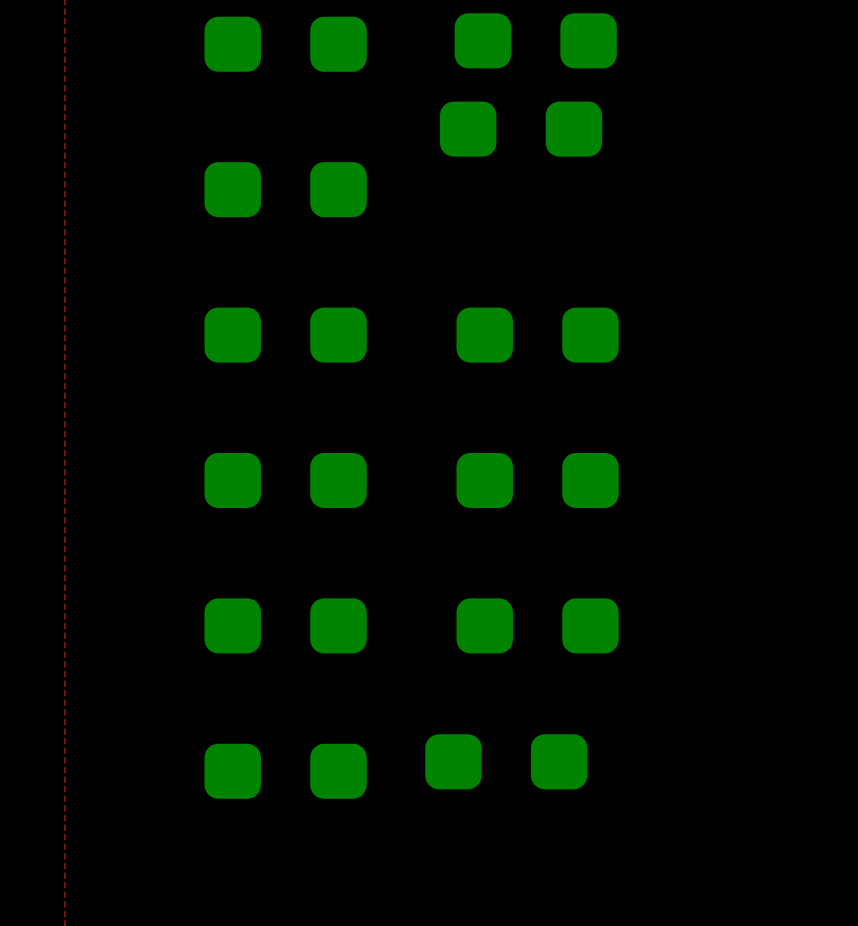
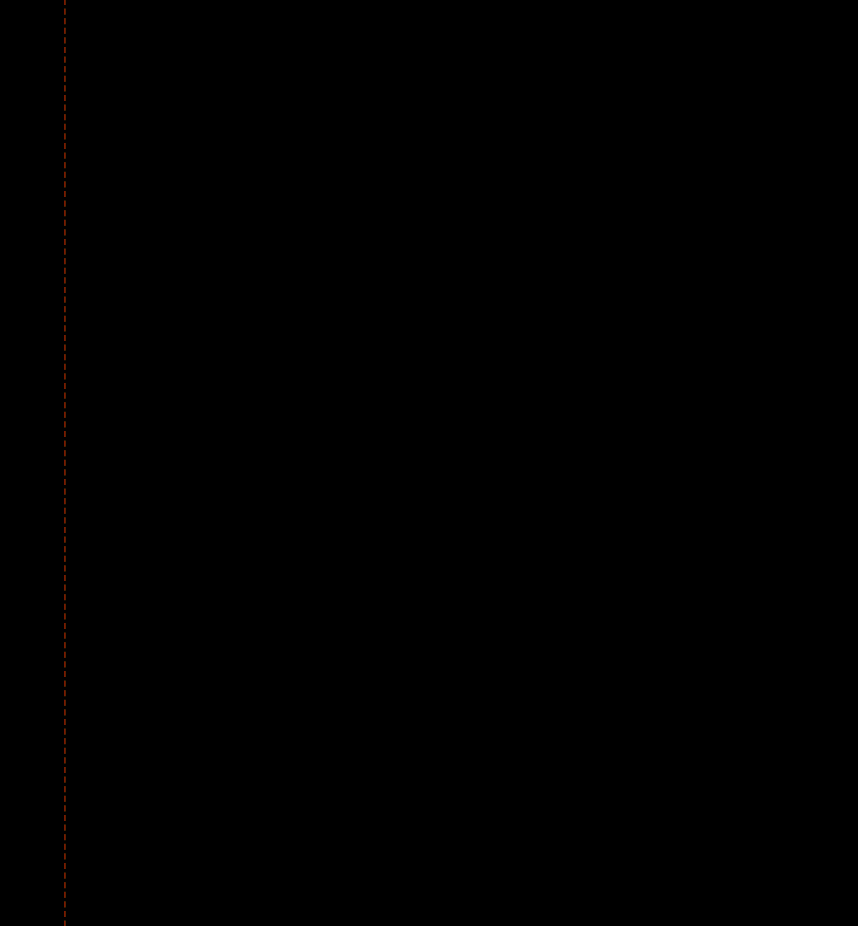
part: (535, 40) -> none
part: (285, 44) -> none
part: (521, 129) -> none
part: (285, 189) -> none
part: (285, 335) -> none
part: (537, 335) -> none
part: (285, 480) -> none
part: (537, 480) -> none
part: (285, 625) -> none
part: (537, 625) -> none
part: (506, 761) -> none
part: (285, 771) -> none

